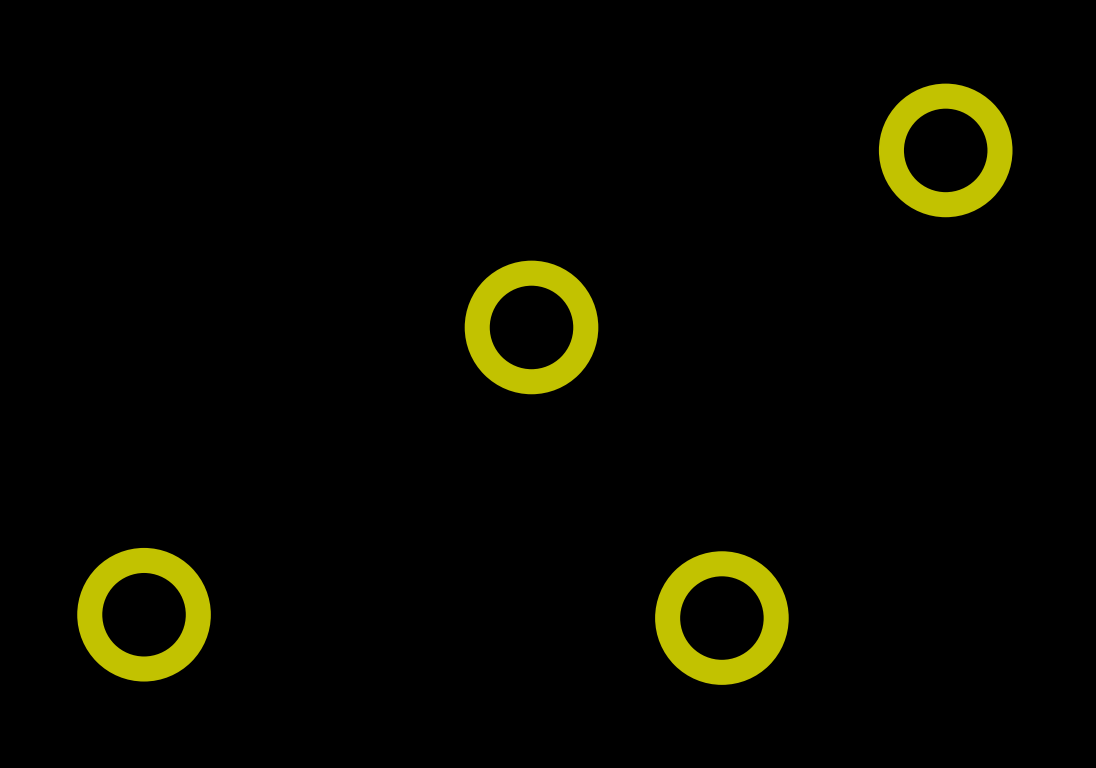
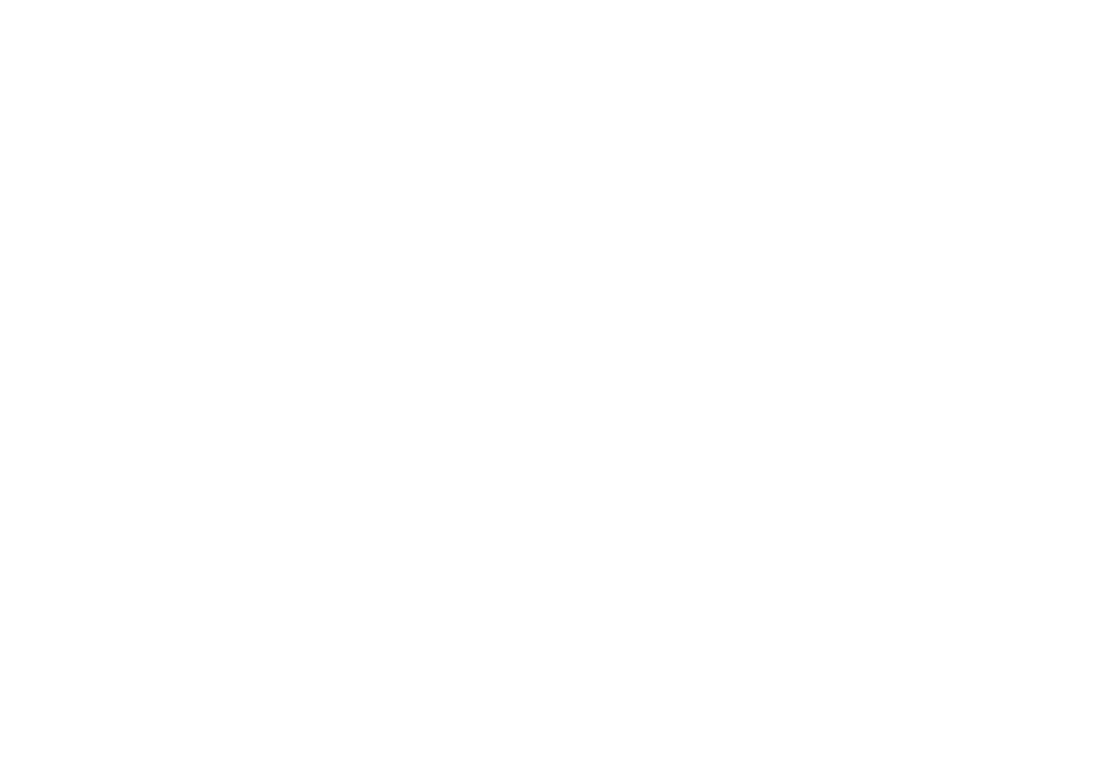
part: (945, 150) -> none
part: (531, 327) -> none
part: (144, 614) -> none
part: (721, 618) -> none

